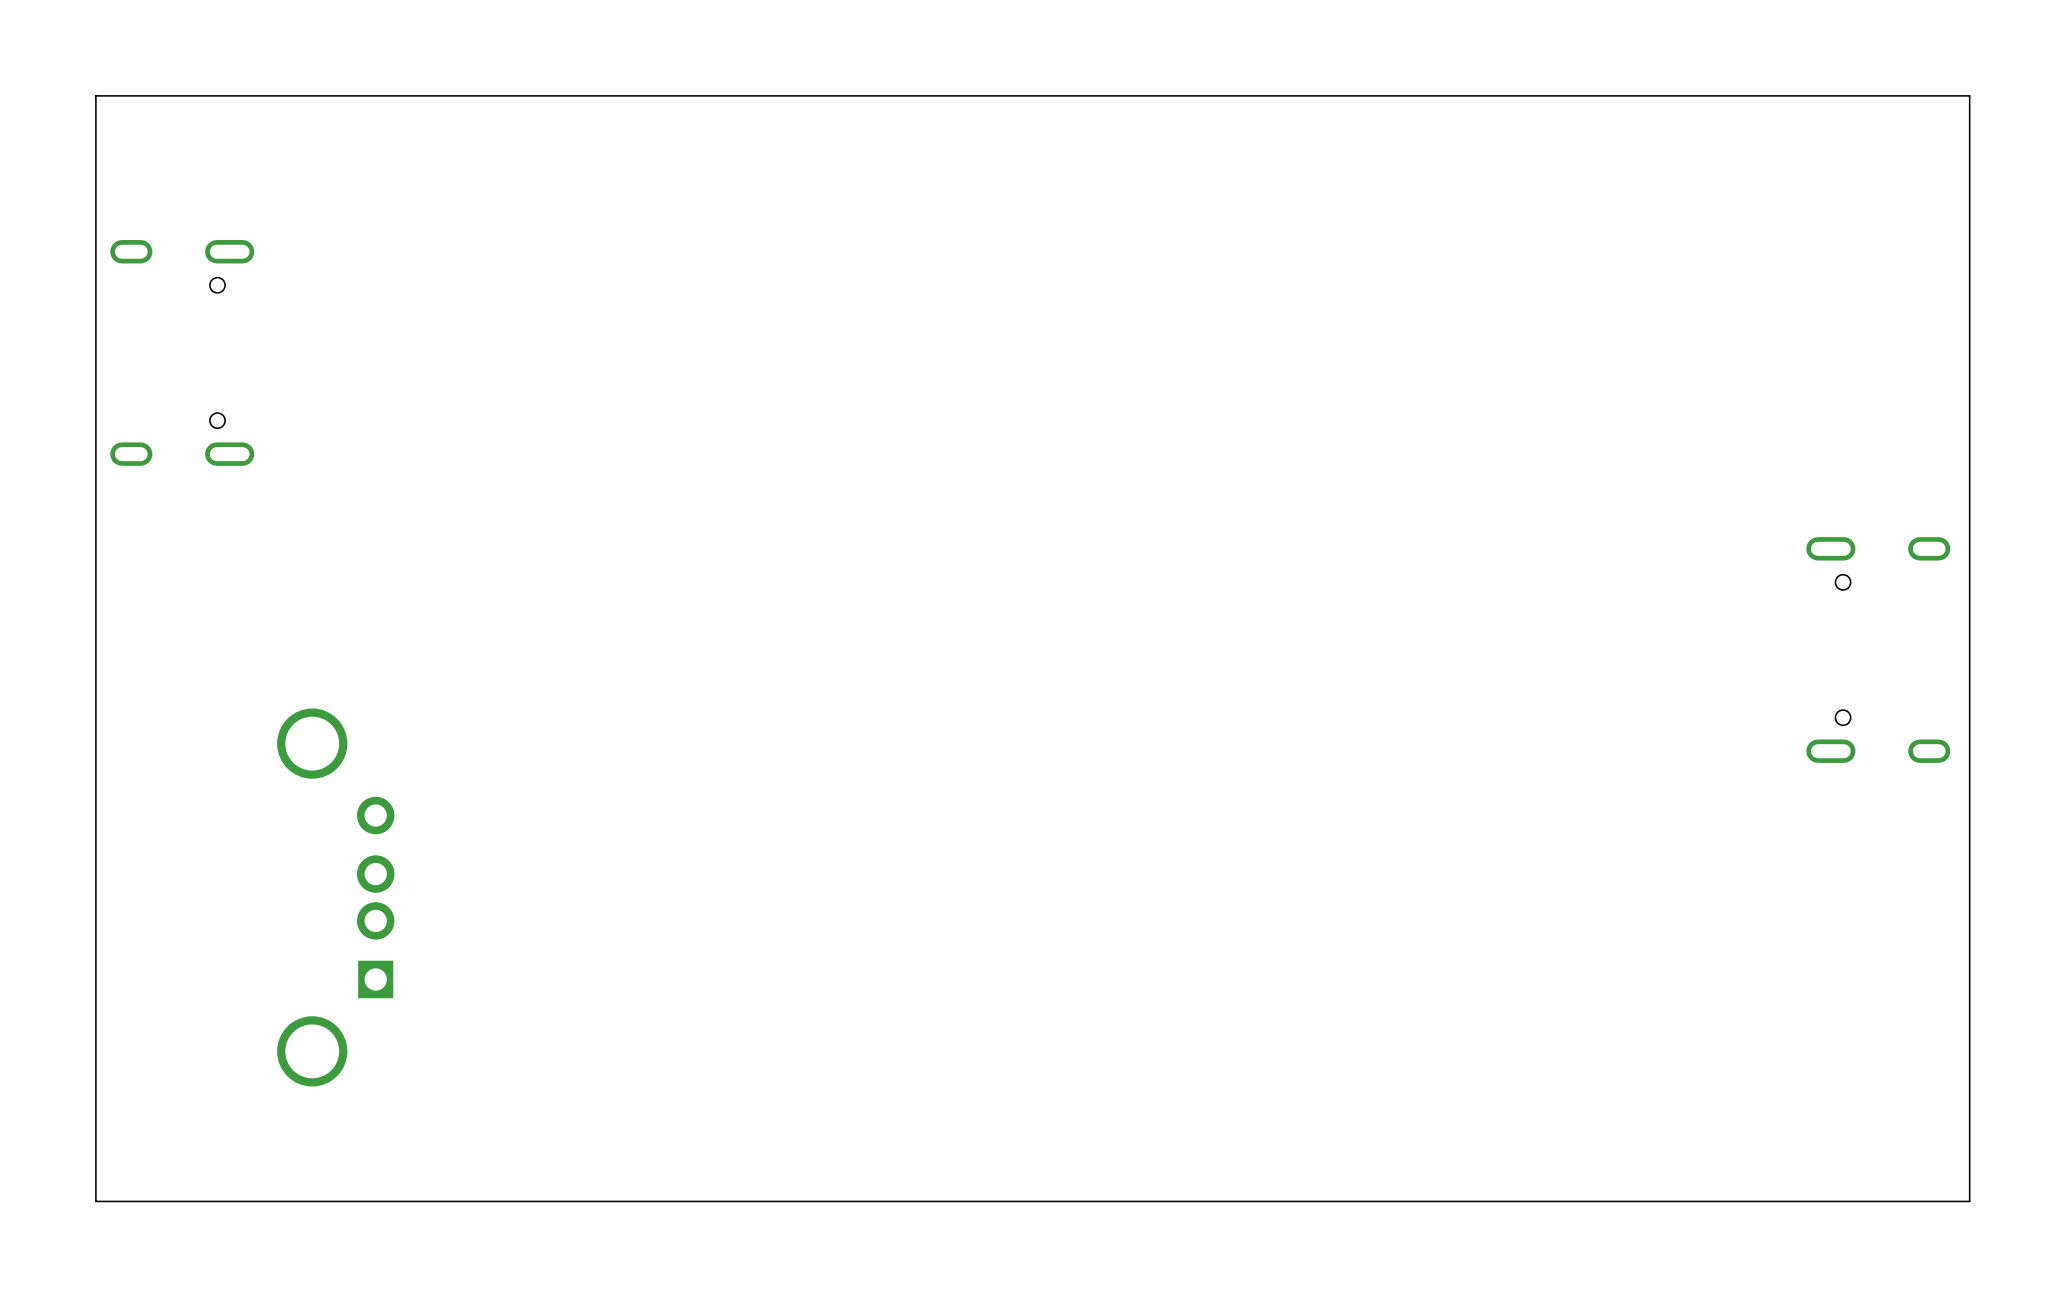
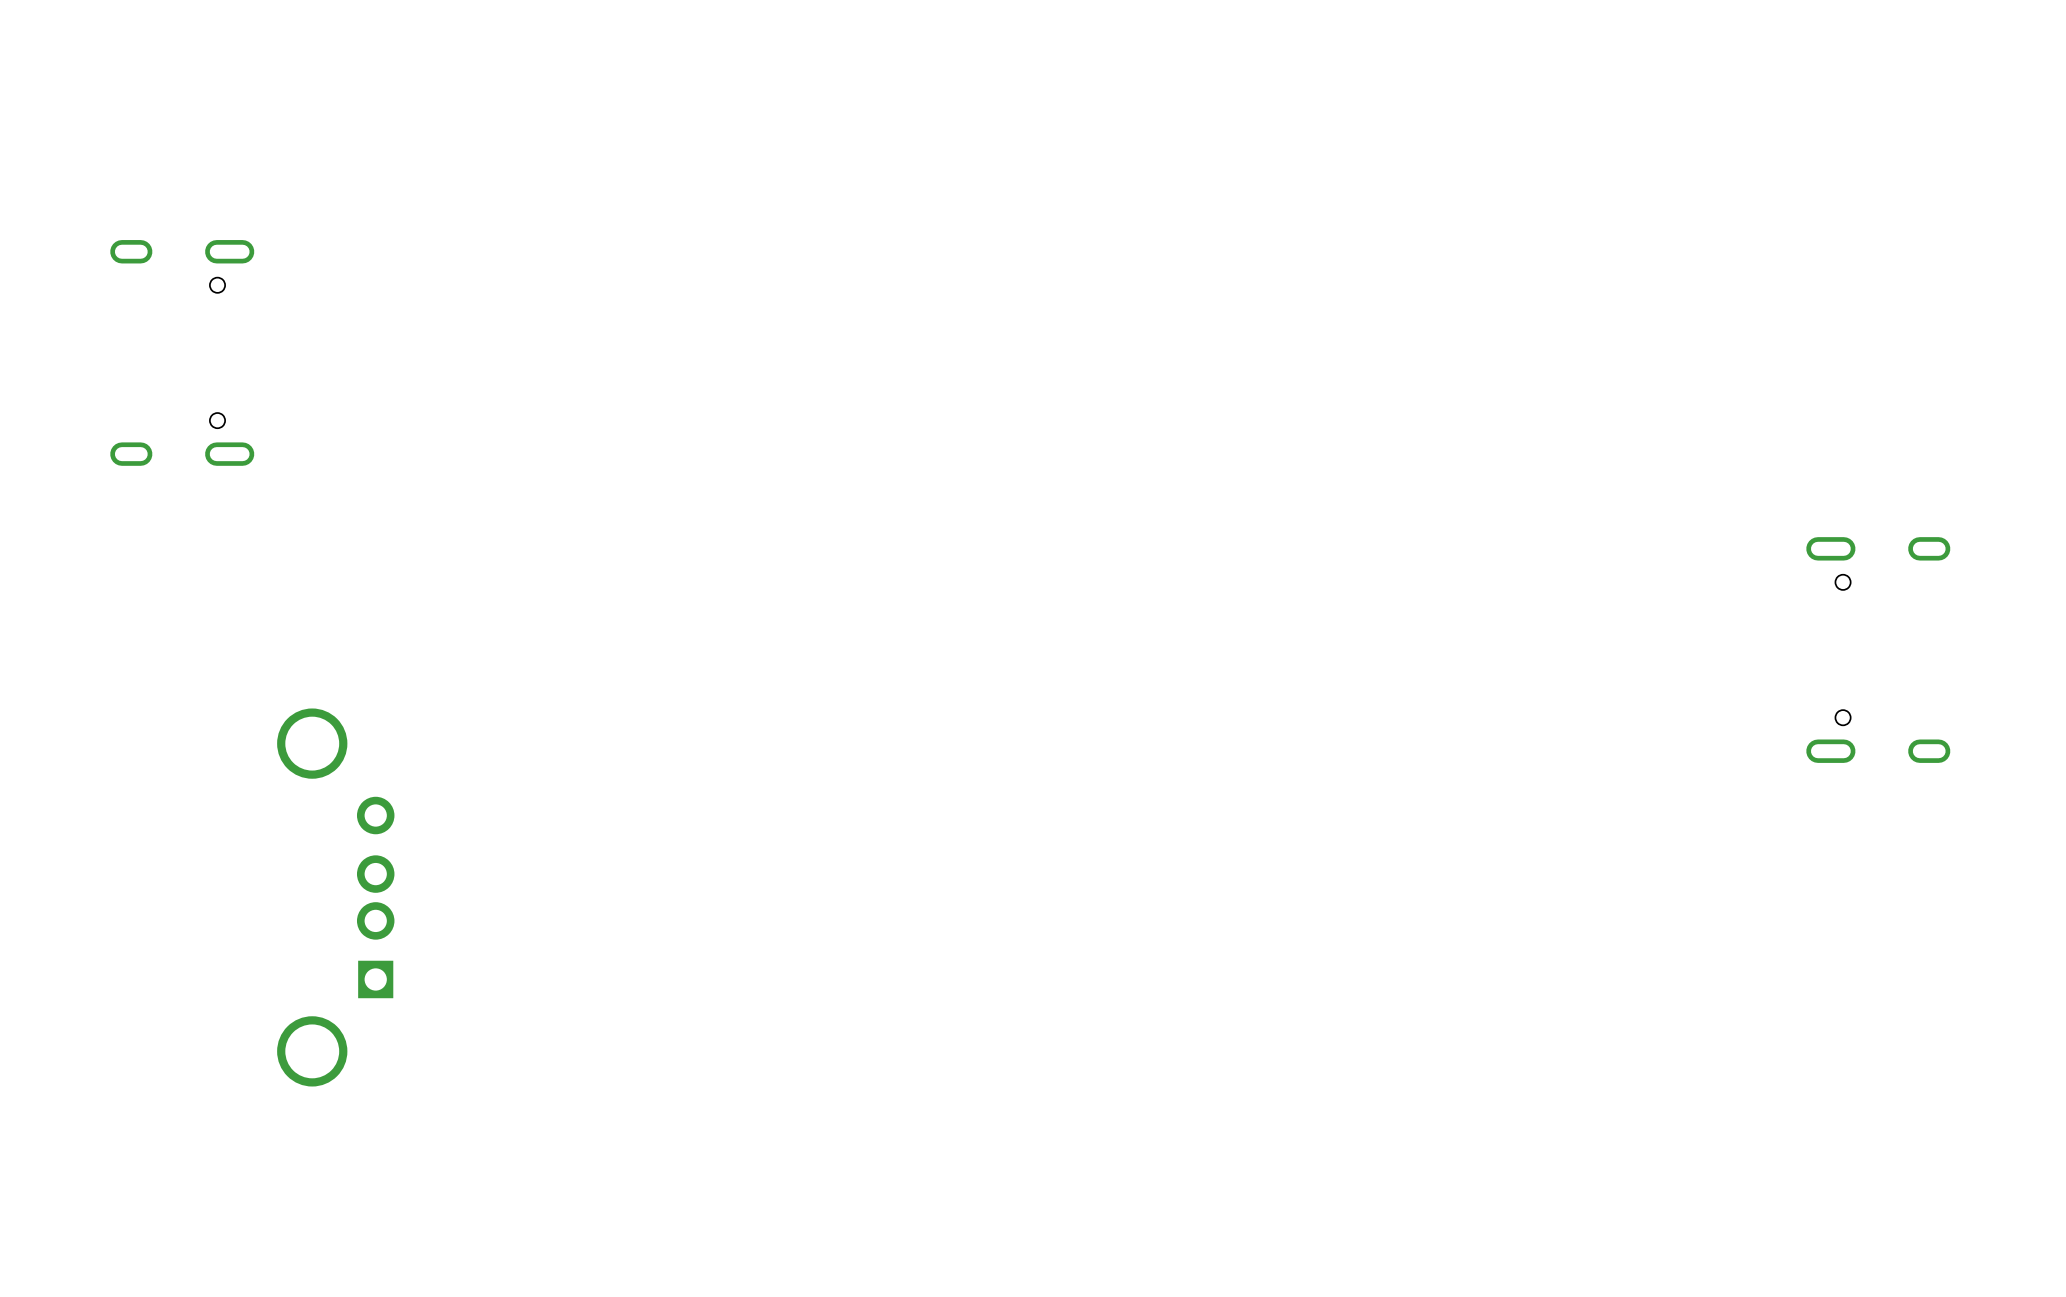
board edge: (1969, 95) (1969, 1201) (95, 1201) (95, 95) (1969, 95) -> none

